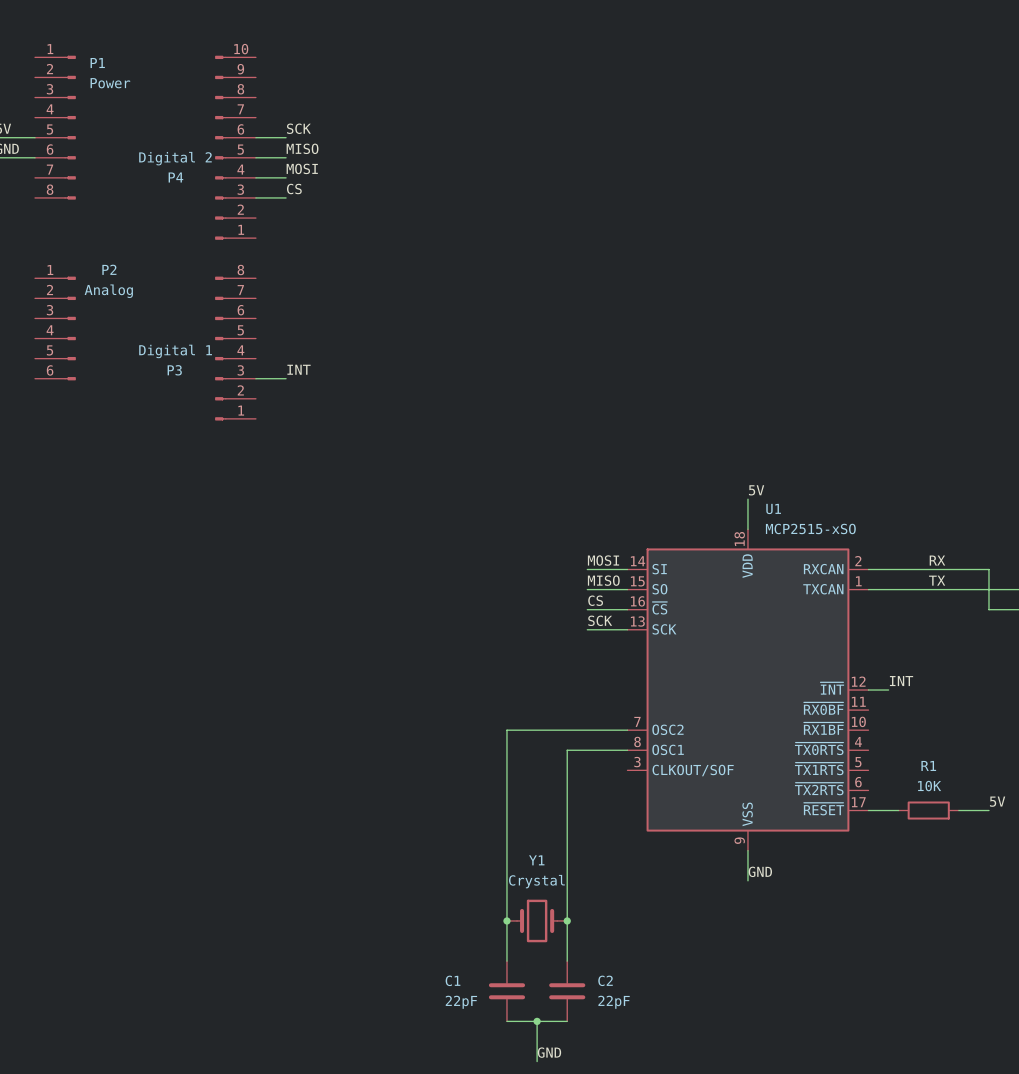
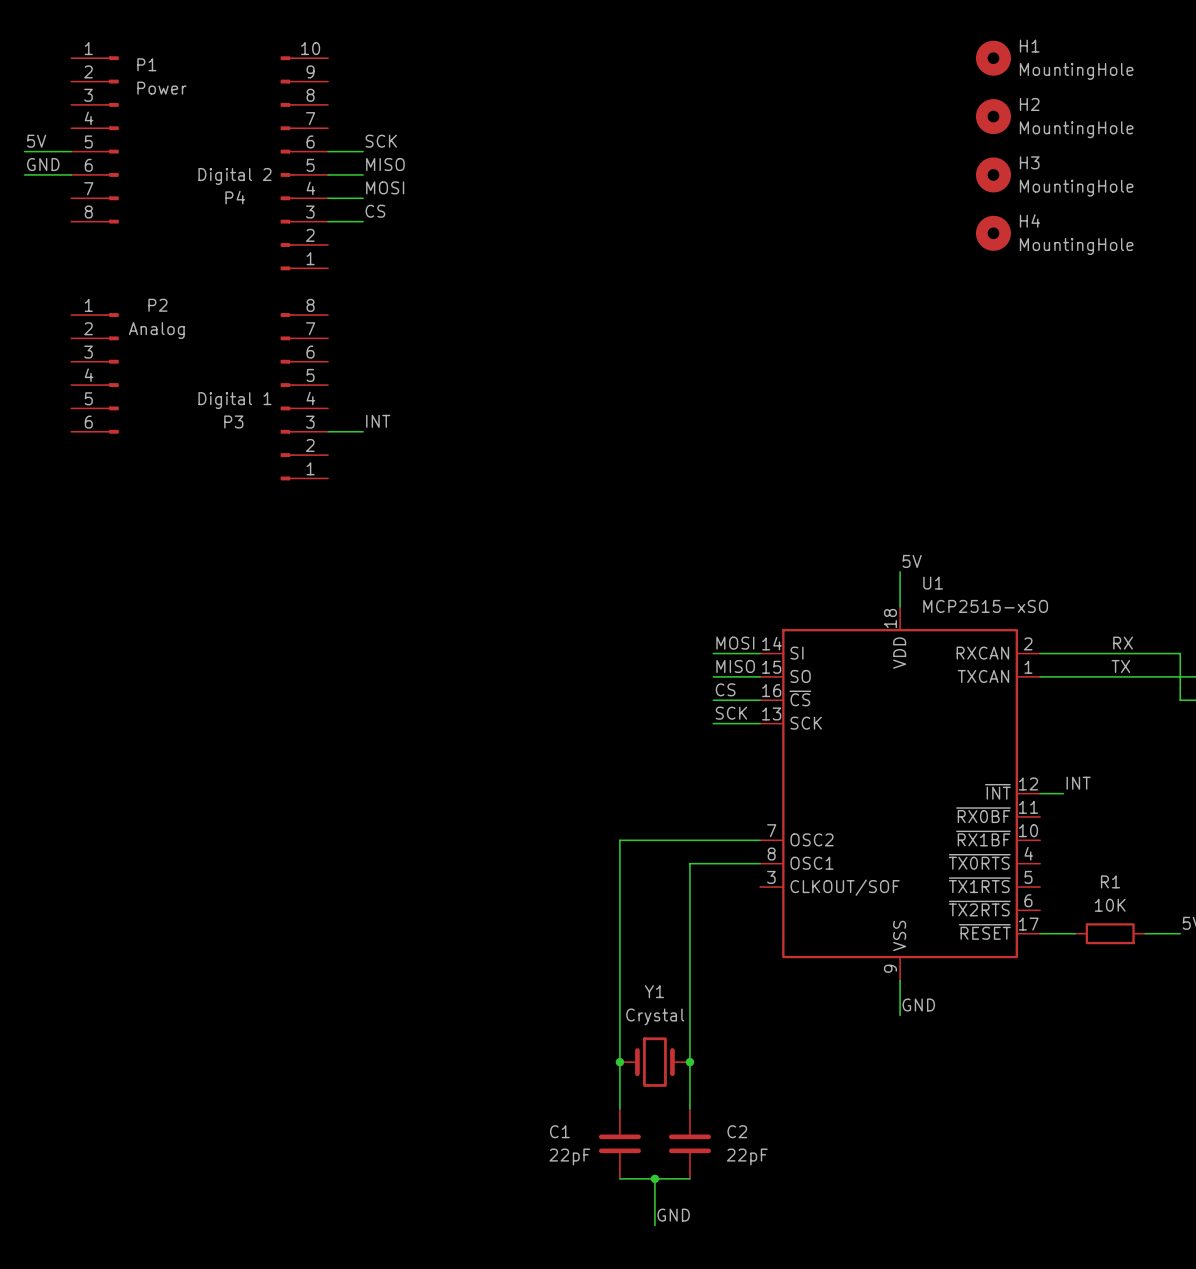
H1: none -> MountingHole (993, 58)
H2: none -> MountingHole (993, 116)
H3: none -> MountingHole (993, 174)
H4: none -> MountingHole (993, 233)

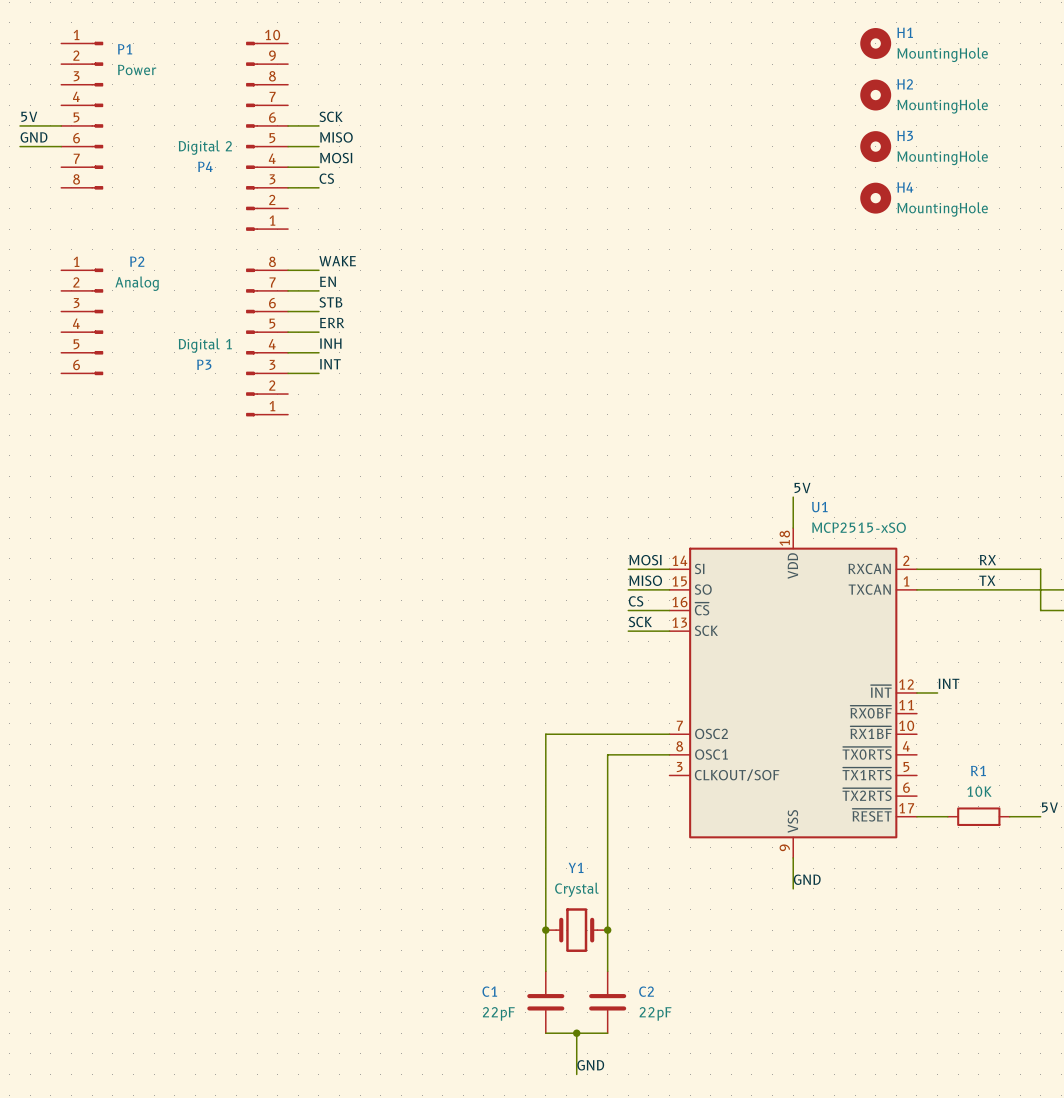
label: none -> WAKE (337, 261)
wire: none -> (288, 270) (318, 270)
label: none -> EN (327, 281)
wire: none -> (288, 290) (318, 290)
label: none -> STB (330, 302)
wire: none -> (288, 311) (318, 311)
label: none -> ERR (332, 322)
wire: none -> (288, 332) (318, 332)
label: none -> INH (330, 343)
wire: none -> (288, 352) (318, 352)

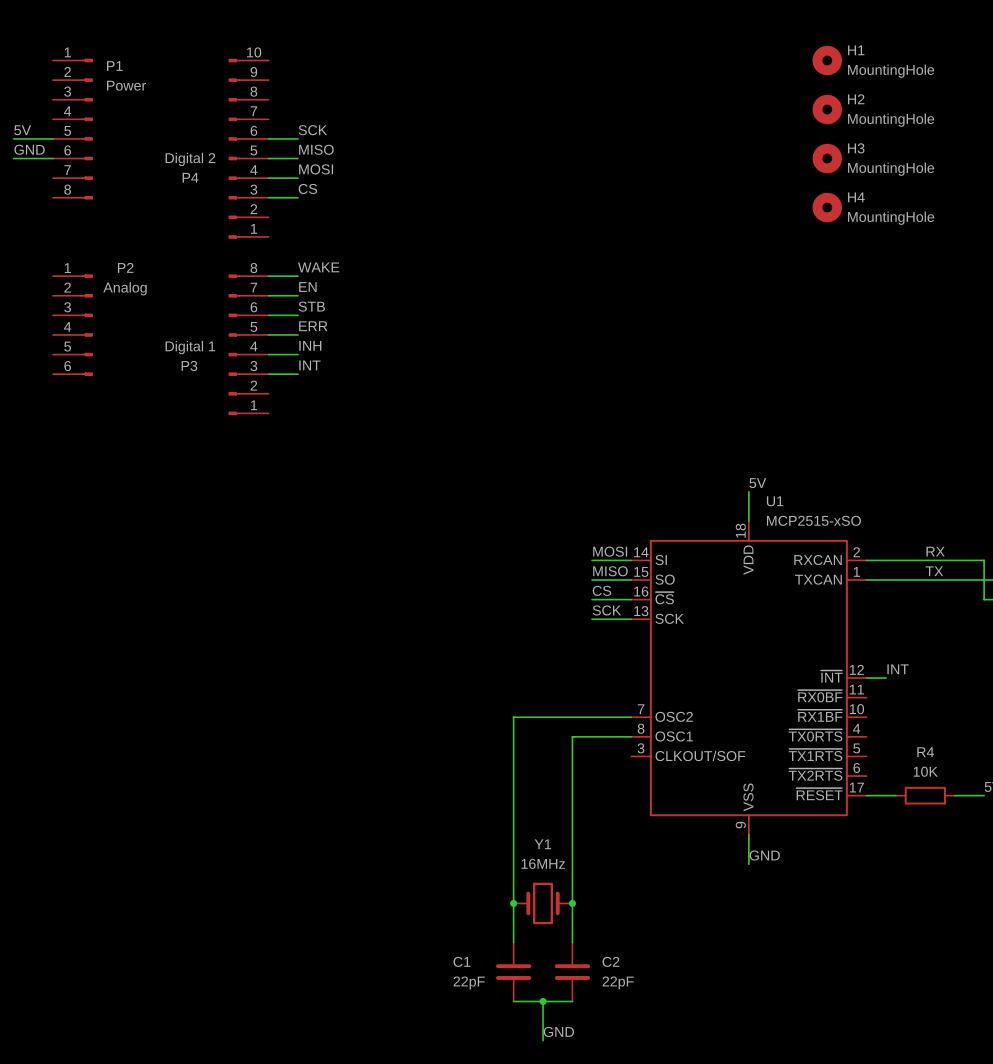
R1 name: R1 (978, 770) -> R4 (925, 752)
Y1 value: Crystal (576, 889) -> 16MHz (543, 863)

